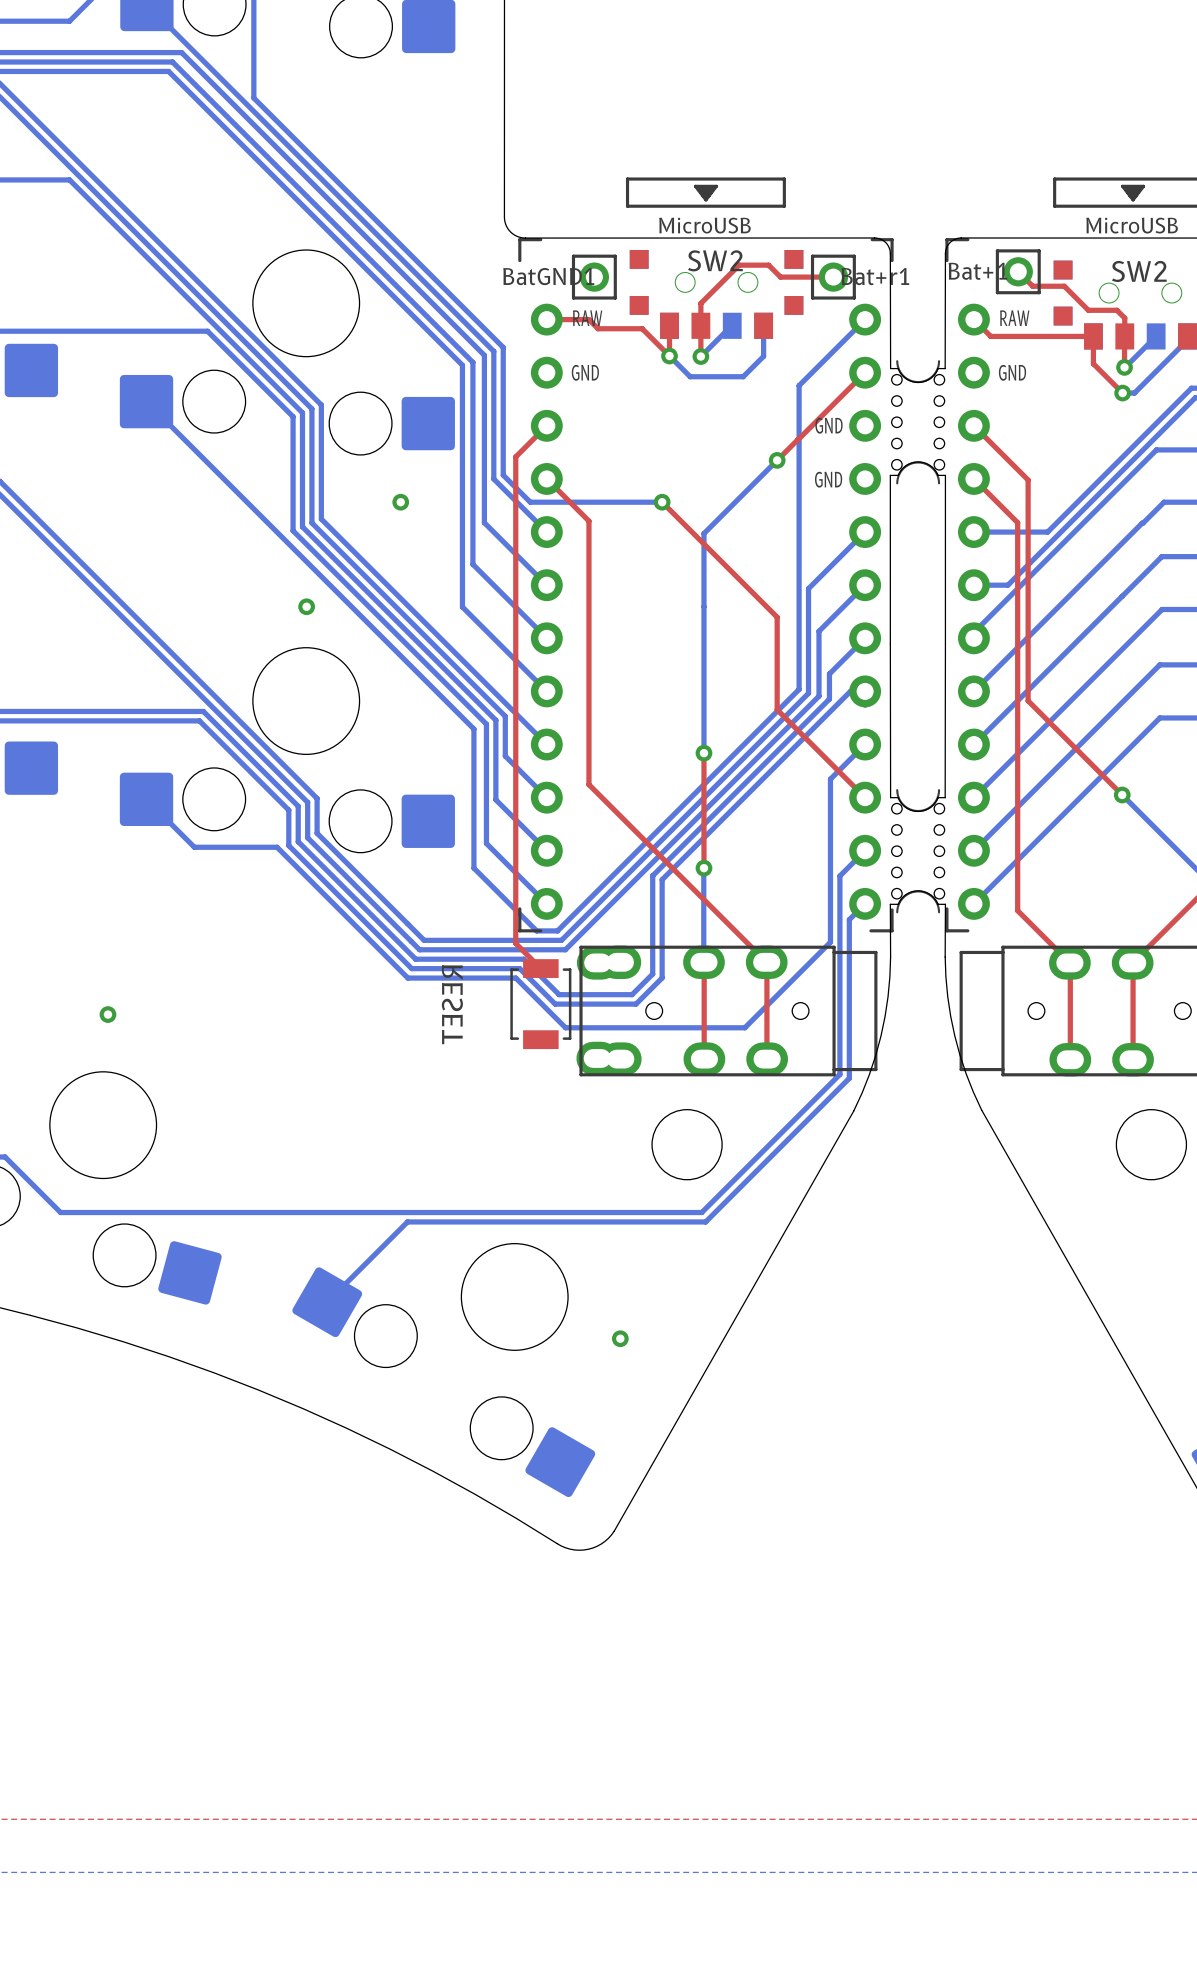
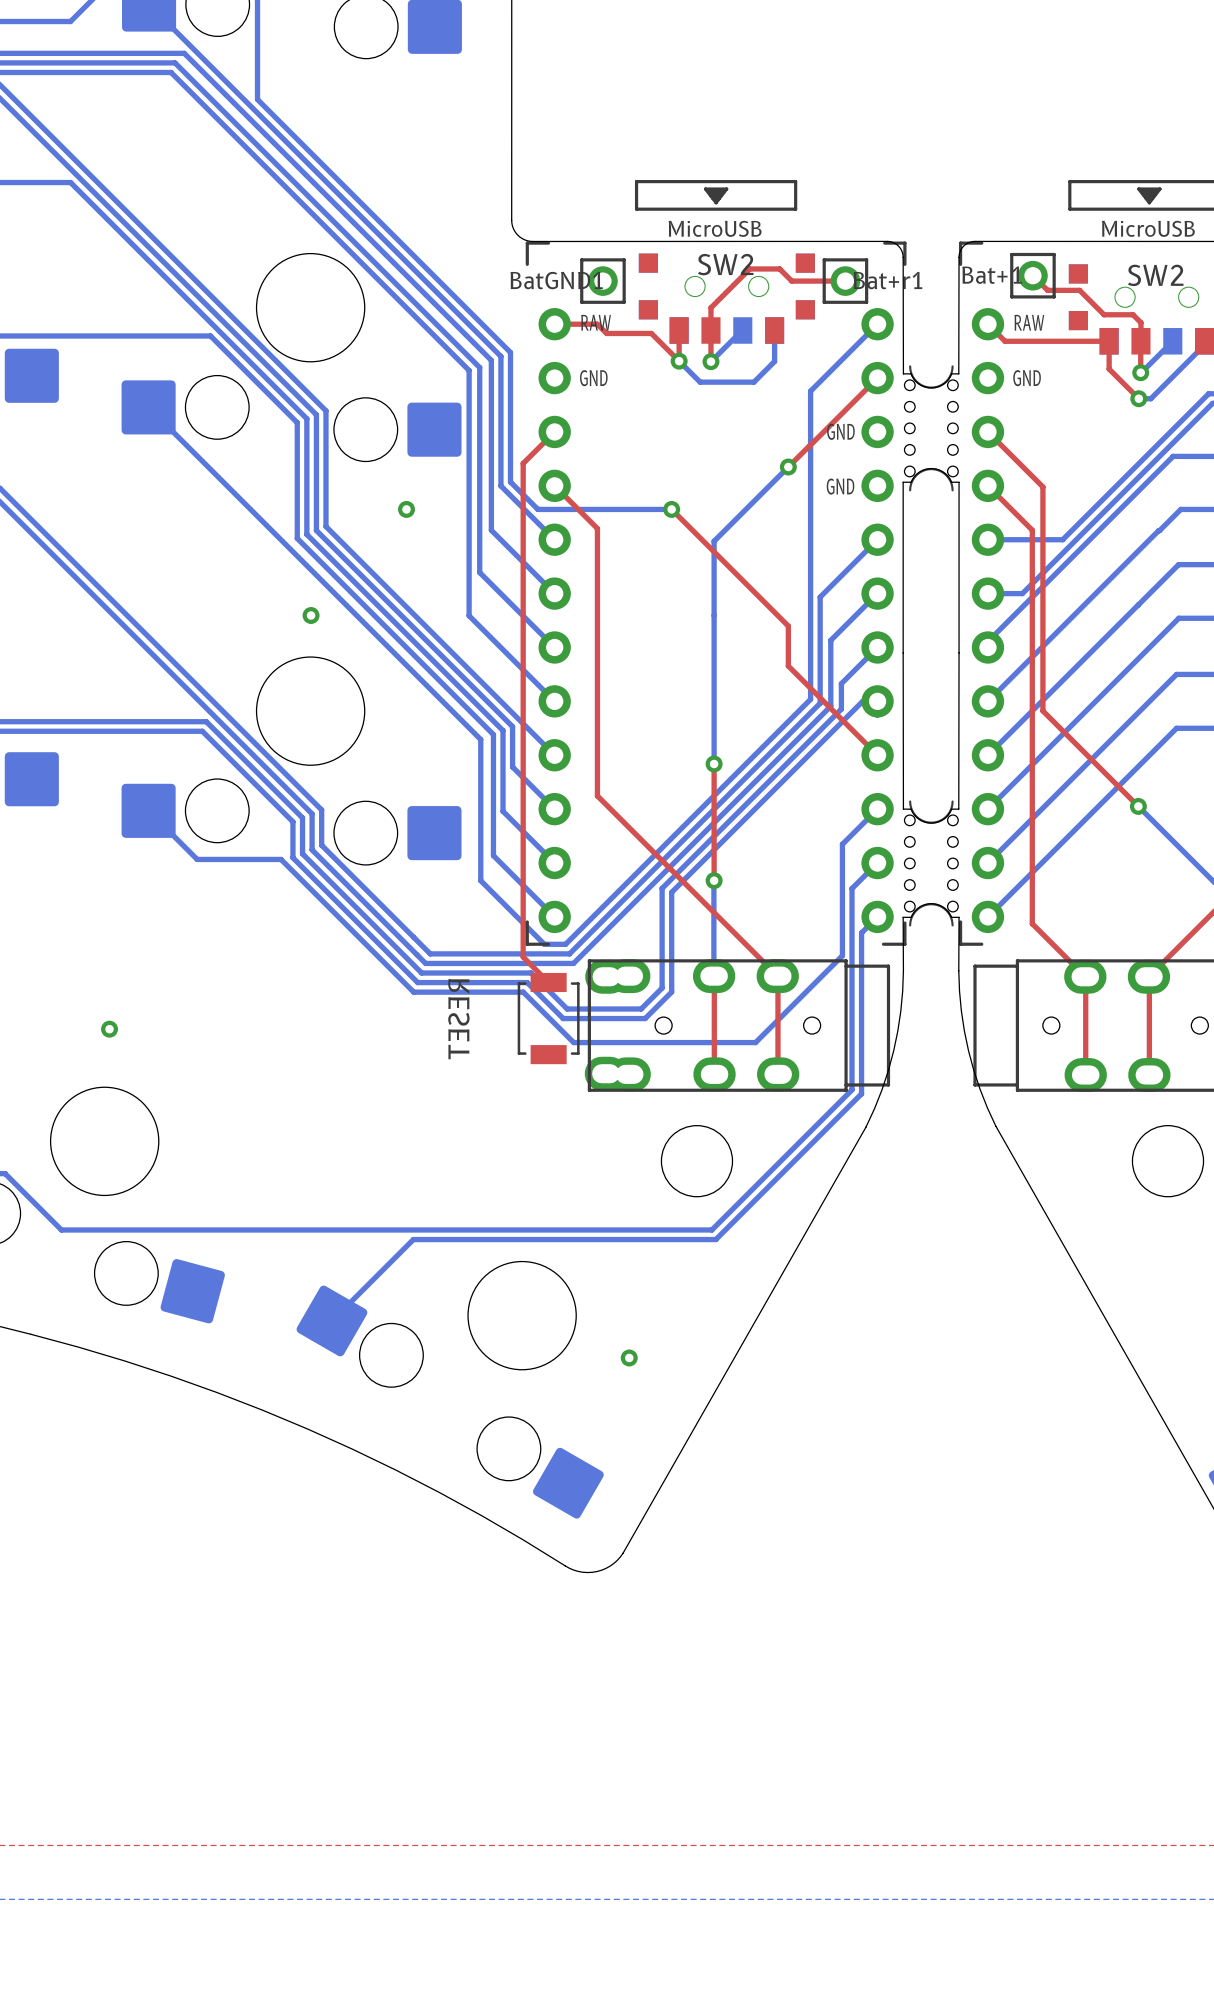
top track: (777, 656) (777, 709) (865, 797) -> (788, 666) (877, 755)
bottom track: (865, 744) (830, 779) (830, 832) -> (877, 809) (842, 844)

